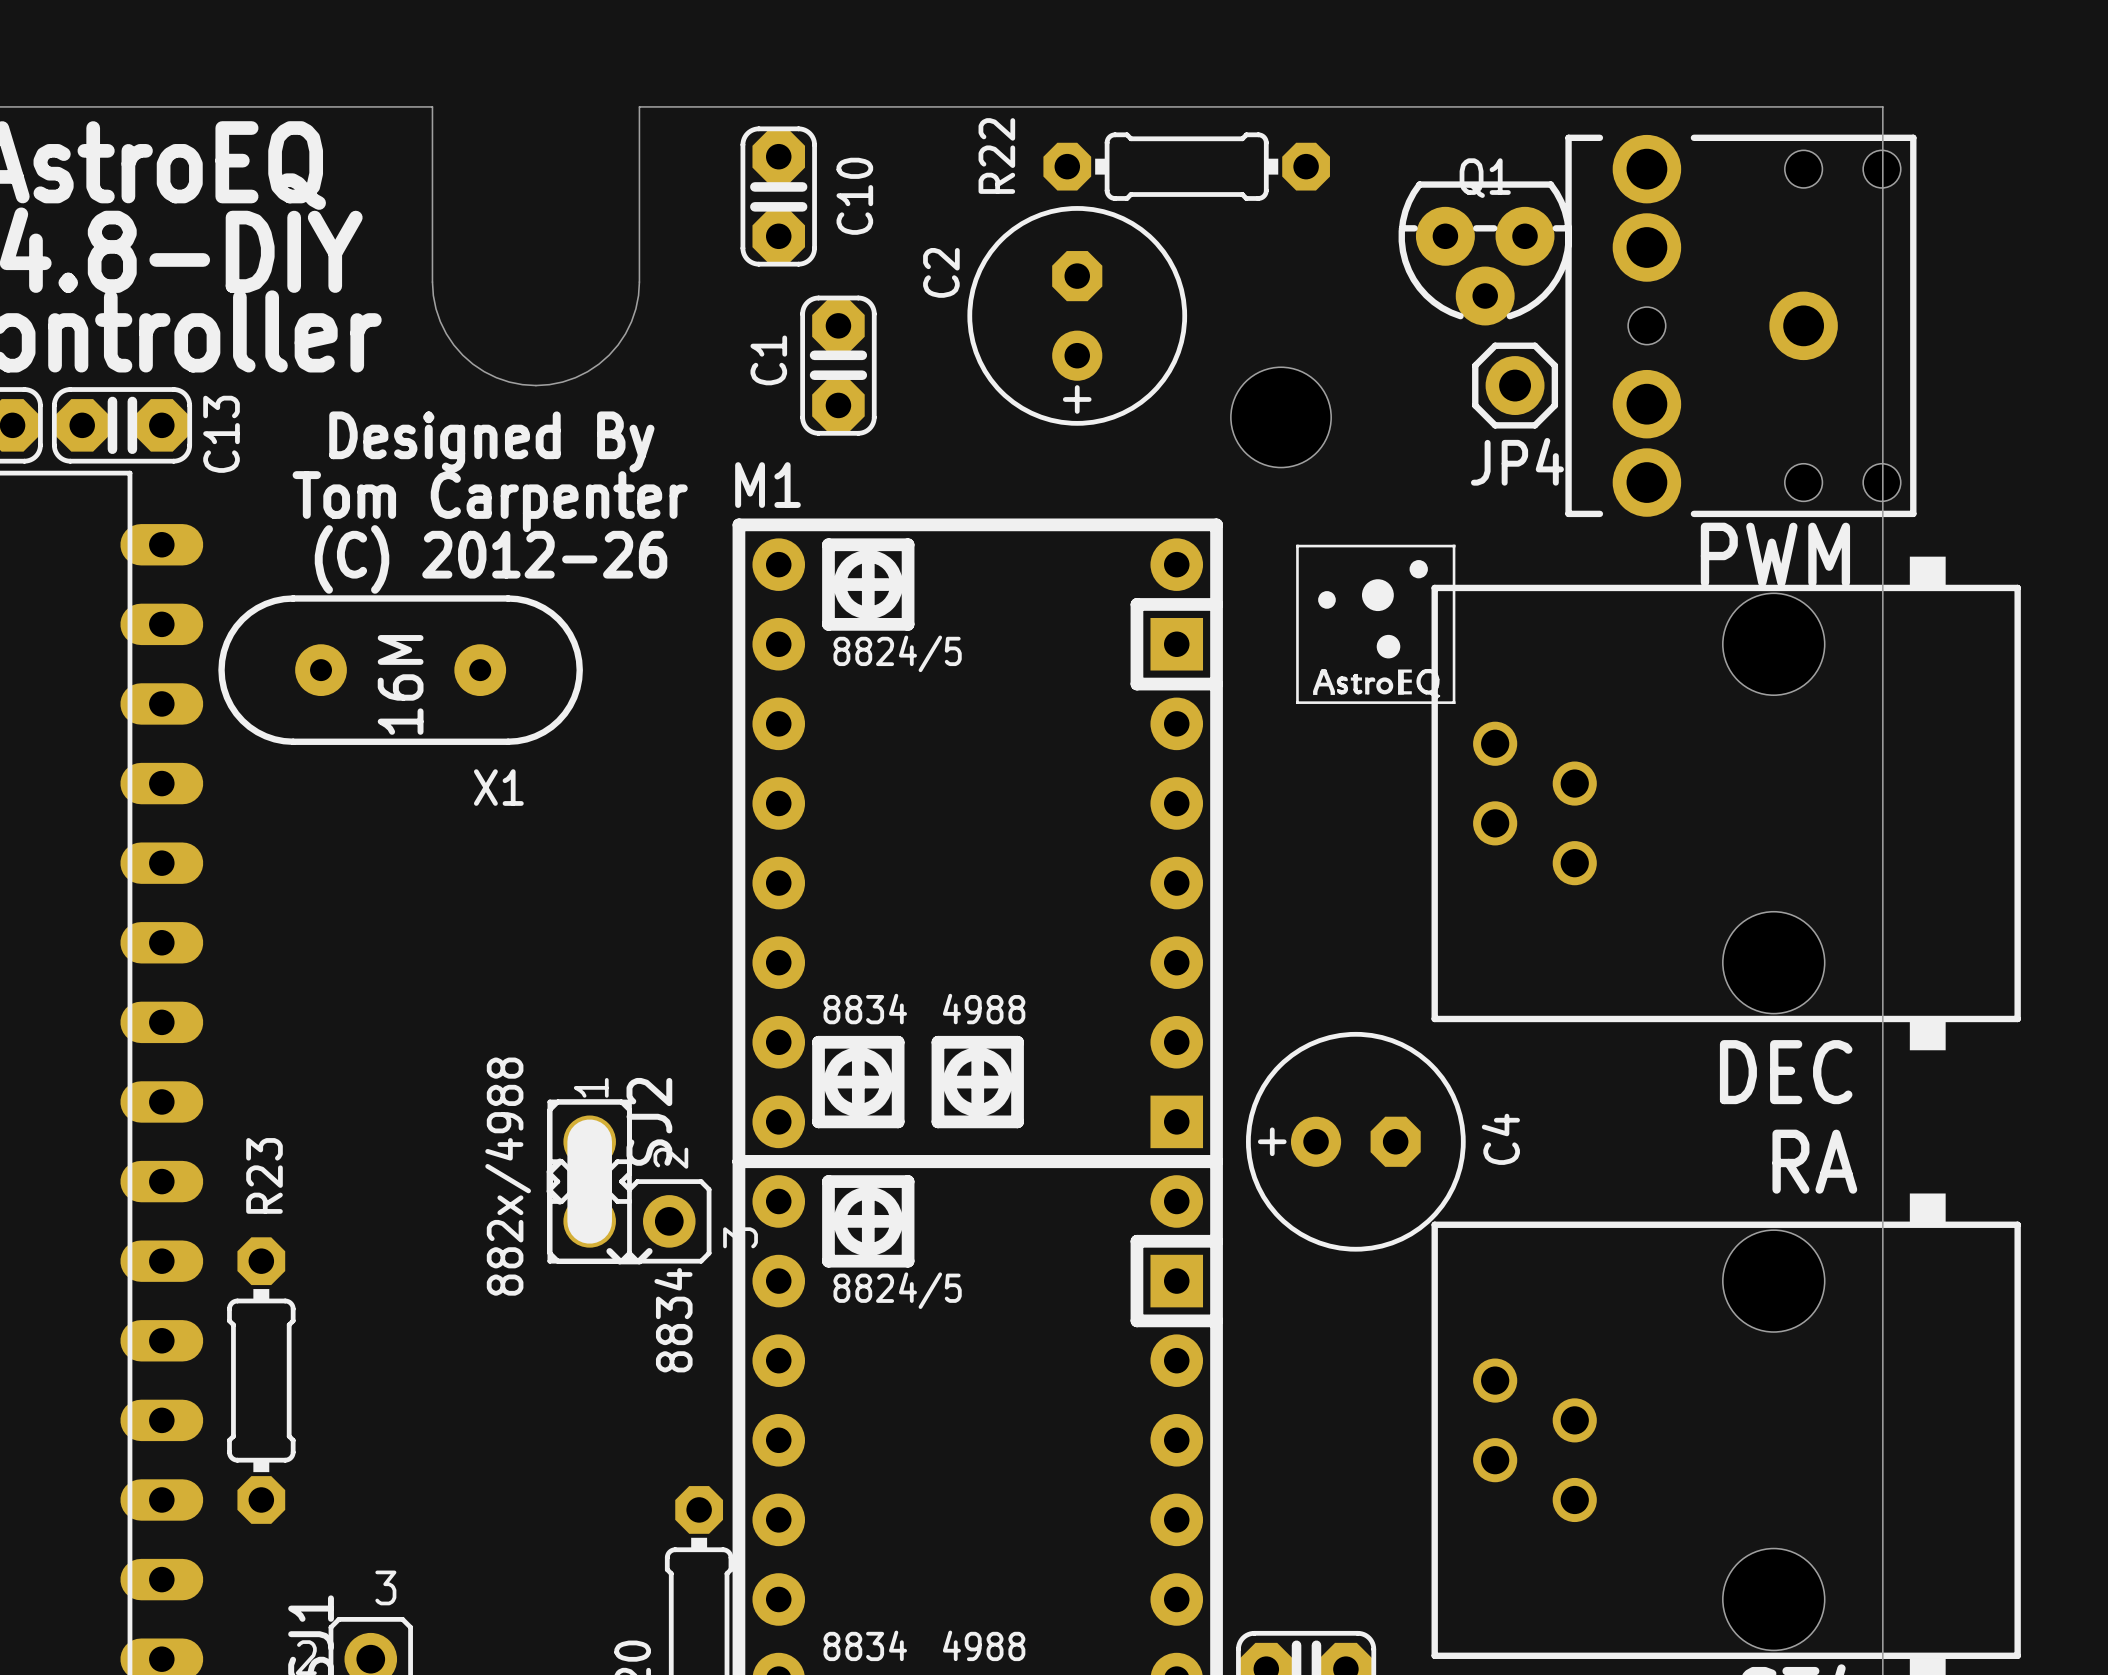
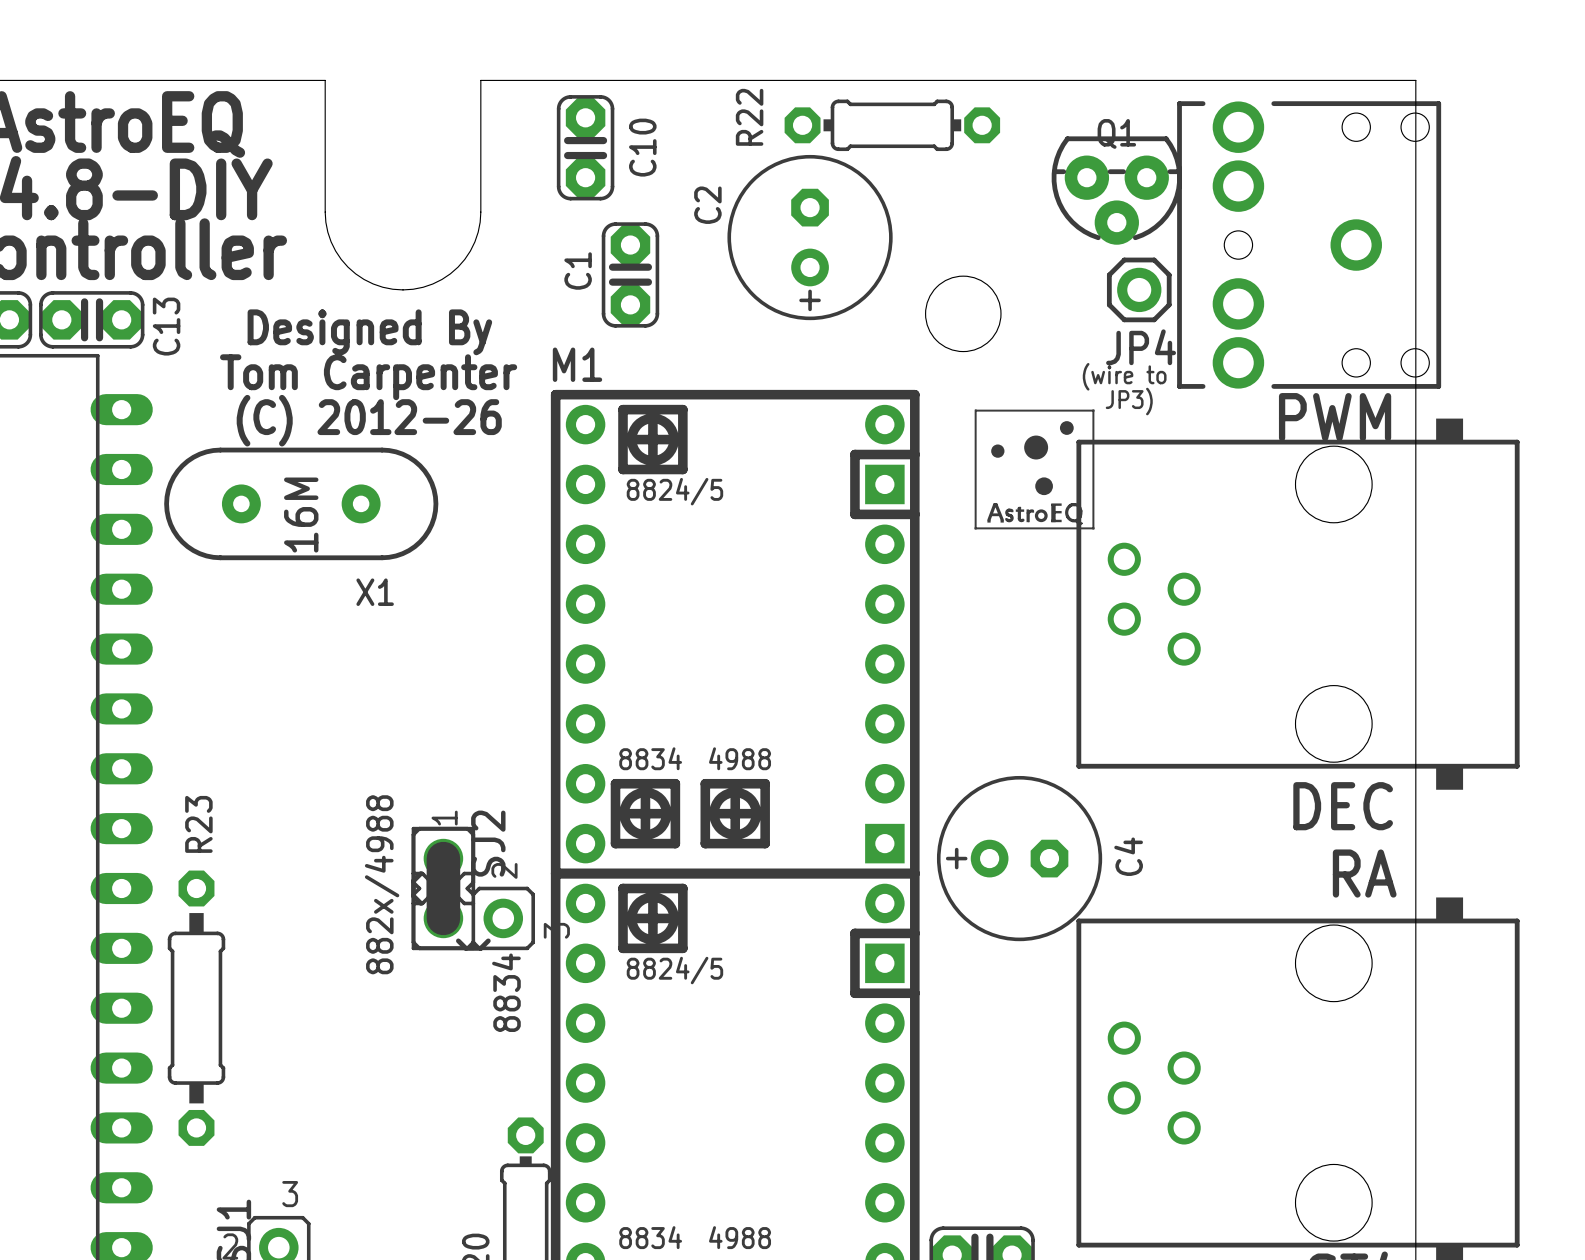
text: none -> (wire to (1124, 376)
text: none -> JP3) (1129, 401)
R23 footprint: [227, 1237, 296, 1524] -> [167, 870, 226, 1146]

